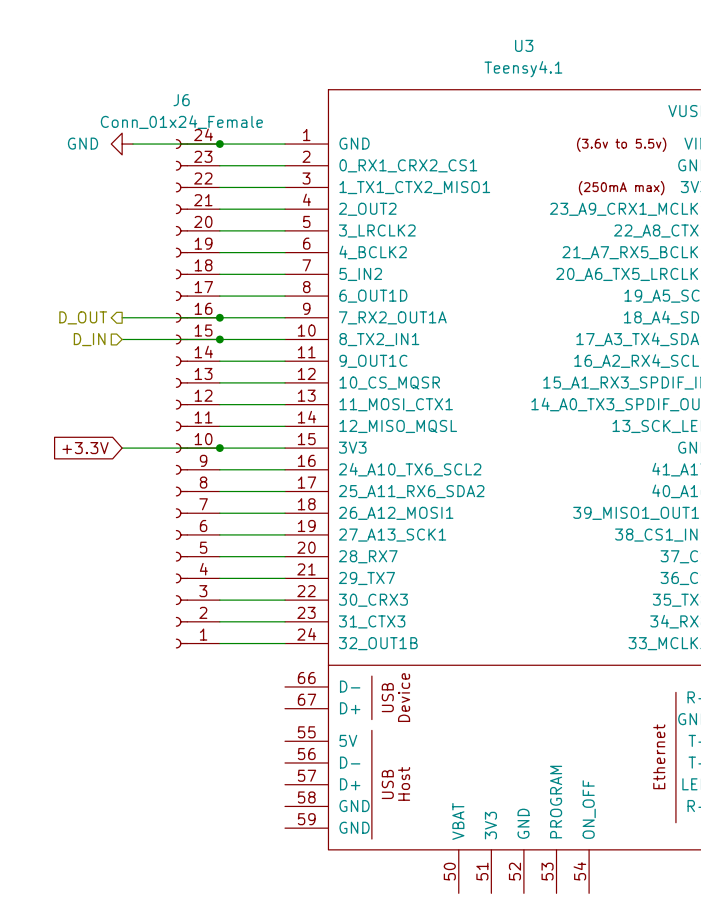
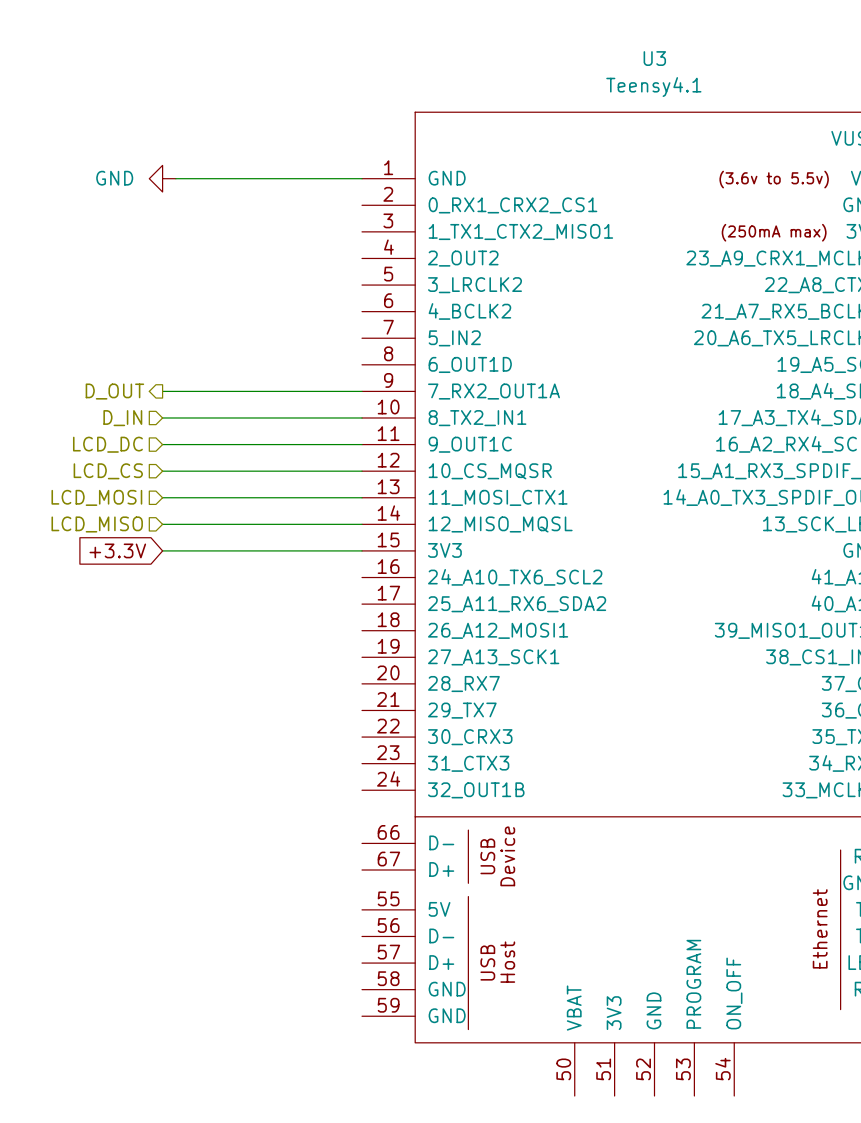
junction: (219, 144) -> none
wire: (219, 165) (285, 165) -> none
wire: (219, 187) (285, 187) -> none
wire: (219, 209) (285, 209) -> none
wire: (219, 230) (285, 230) -> none
wire: (219, 252) (285, 252) -> none
wire: (219, 274) (285, 274) -> none
wire: (219, 296) (285, 296) -> none
junction: (219, 317) -> none
junction: (219, 339) -> none
hierarchical label: none -> LCD_DC (107, 444)
wire: none -> (162, 444) (282, 444)
wire: none -> (162, 471) (282, 471)
hierarchical label: none -> LCD_CS (108, 471)
J6: Conn_01x24_Female (197, 393) -> none
hierarchical label: none -> LCD_MOSI (96, 497)
wire: none -> (162, 497) (282, 497)
hierarchical label: none -> LCD_MISO (97, 524)
wire: none -> (162, 524) (282, 524)
junction: (219, 448) -> none
wire: (219, 469) (285, 469) -> none
wire: (219, 491) (285, 491) -> none
wire: (219, 513) (285, 513) -> none
wire: (219, 534) (285, 534) -> none
wire: (219, 556) (285, 556) -> none
wire: (219, 578) (285, 578) -> none
wire: (219, 600) (285, 600) -> none
wire: (219, 621) (285, 621) -> none
wire: (219, 643) (285, 643) -> none

